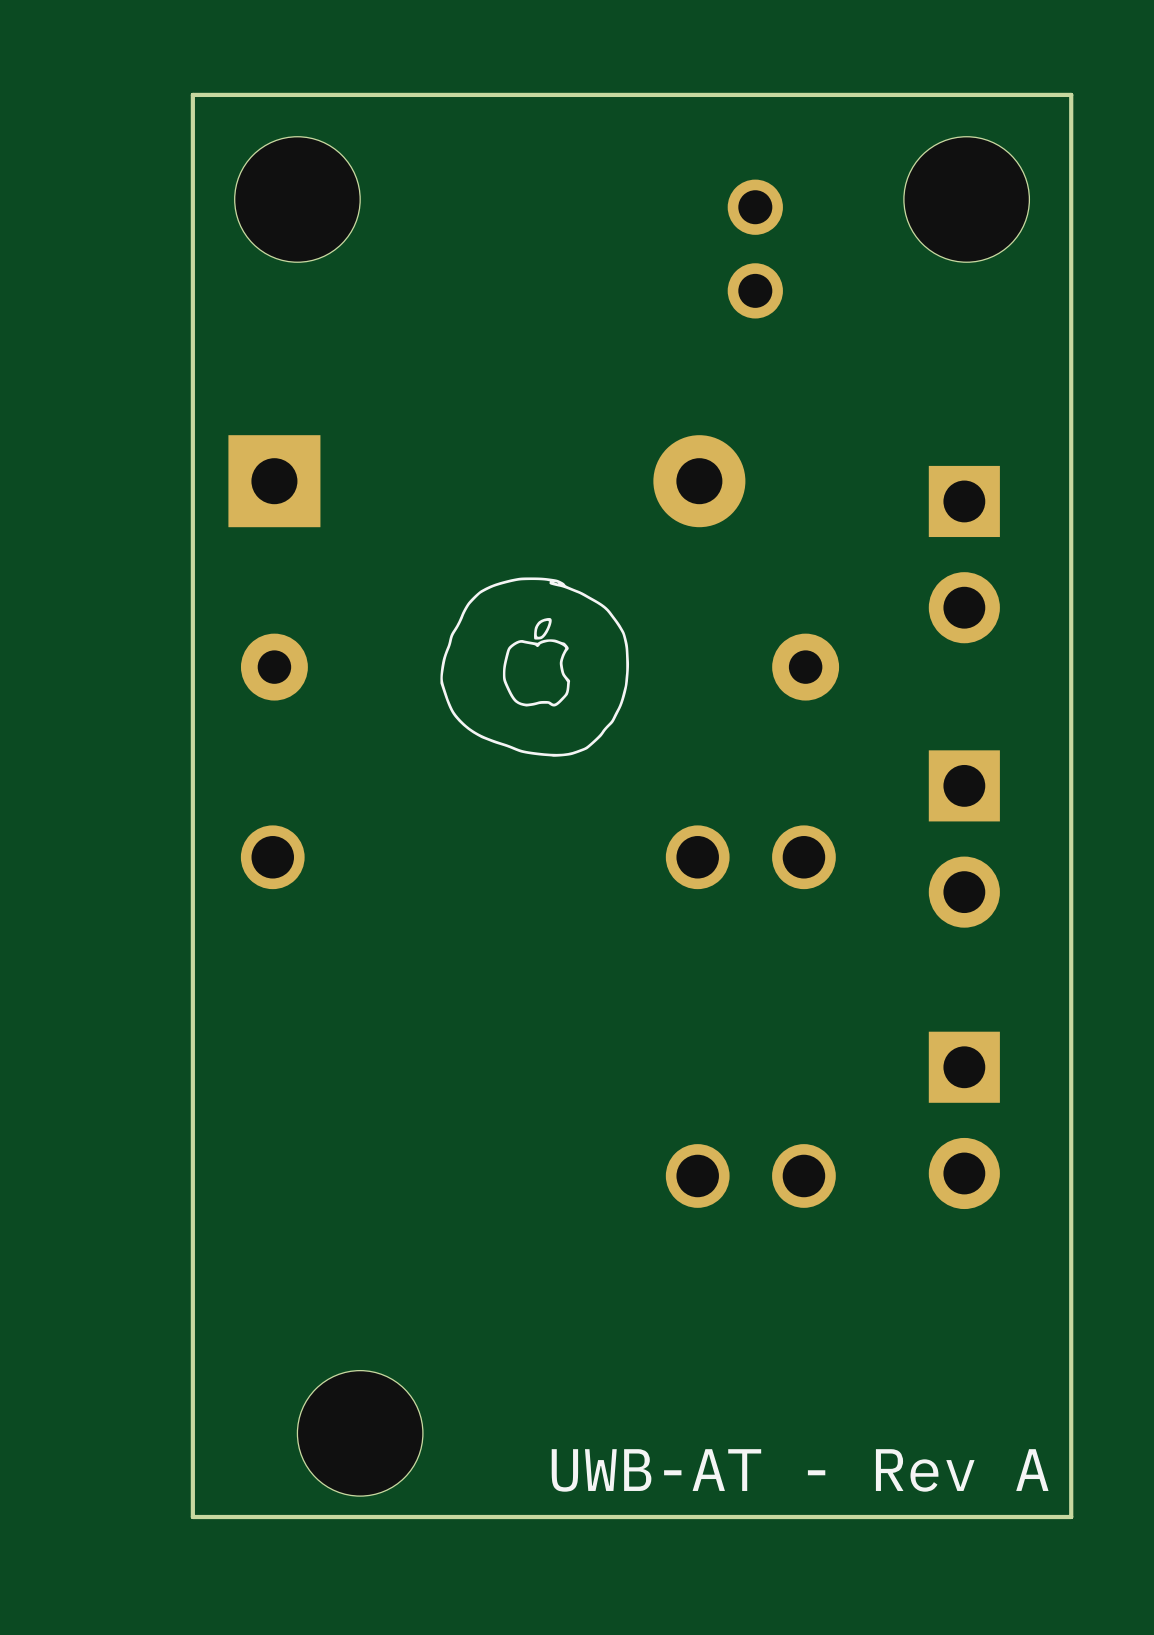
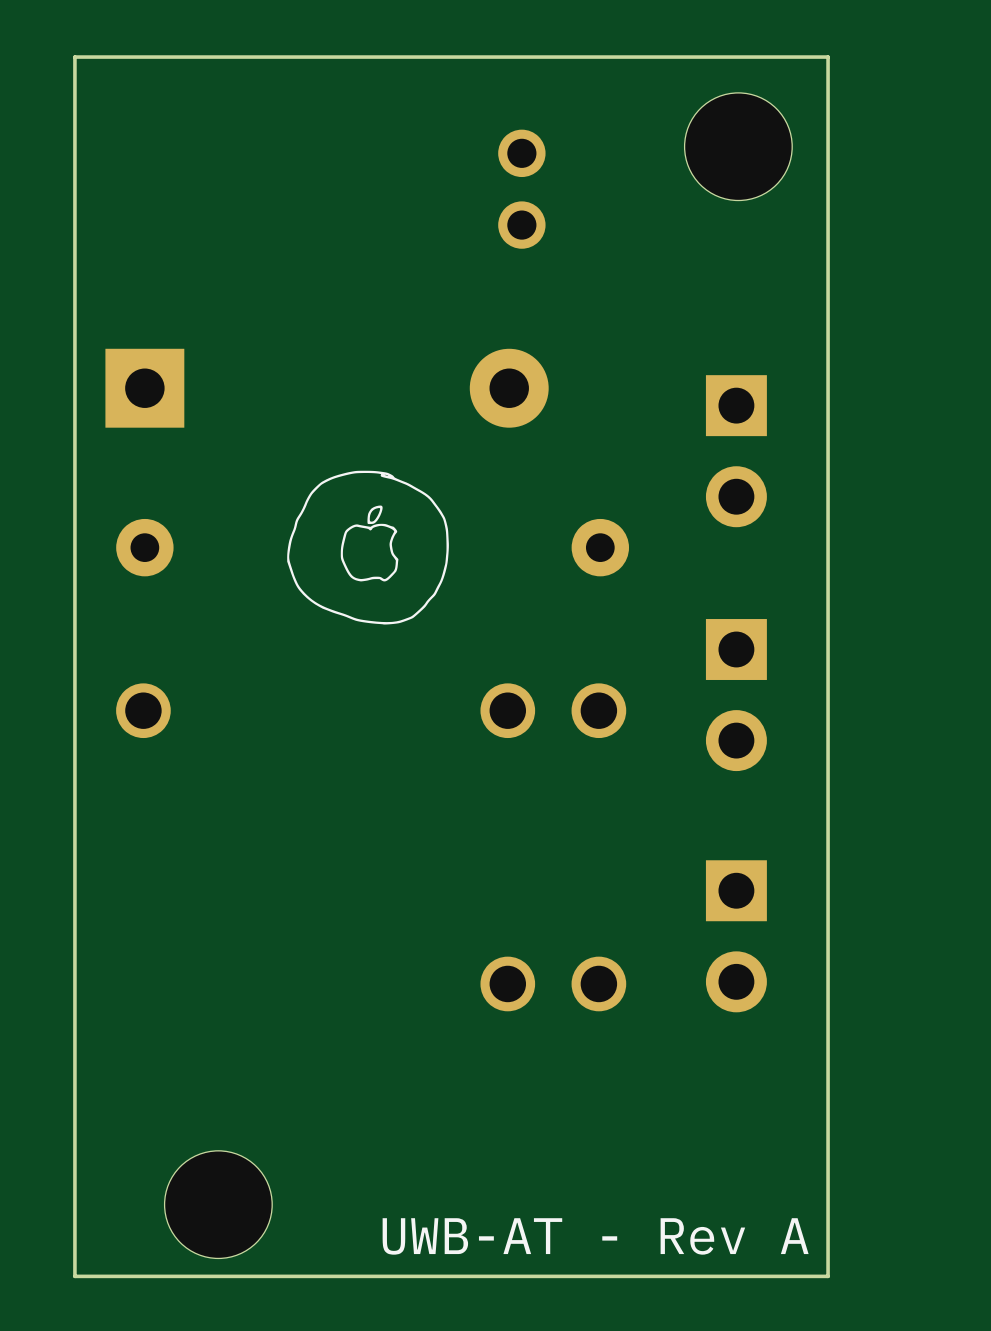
part: (297, 199) -> none
part position: (755, 249) -> (521, 189)

